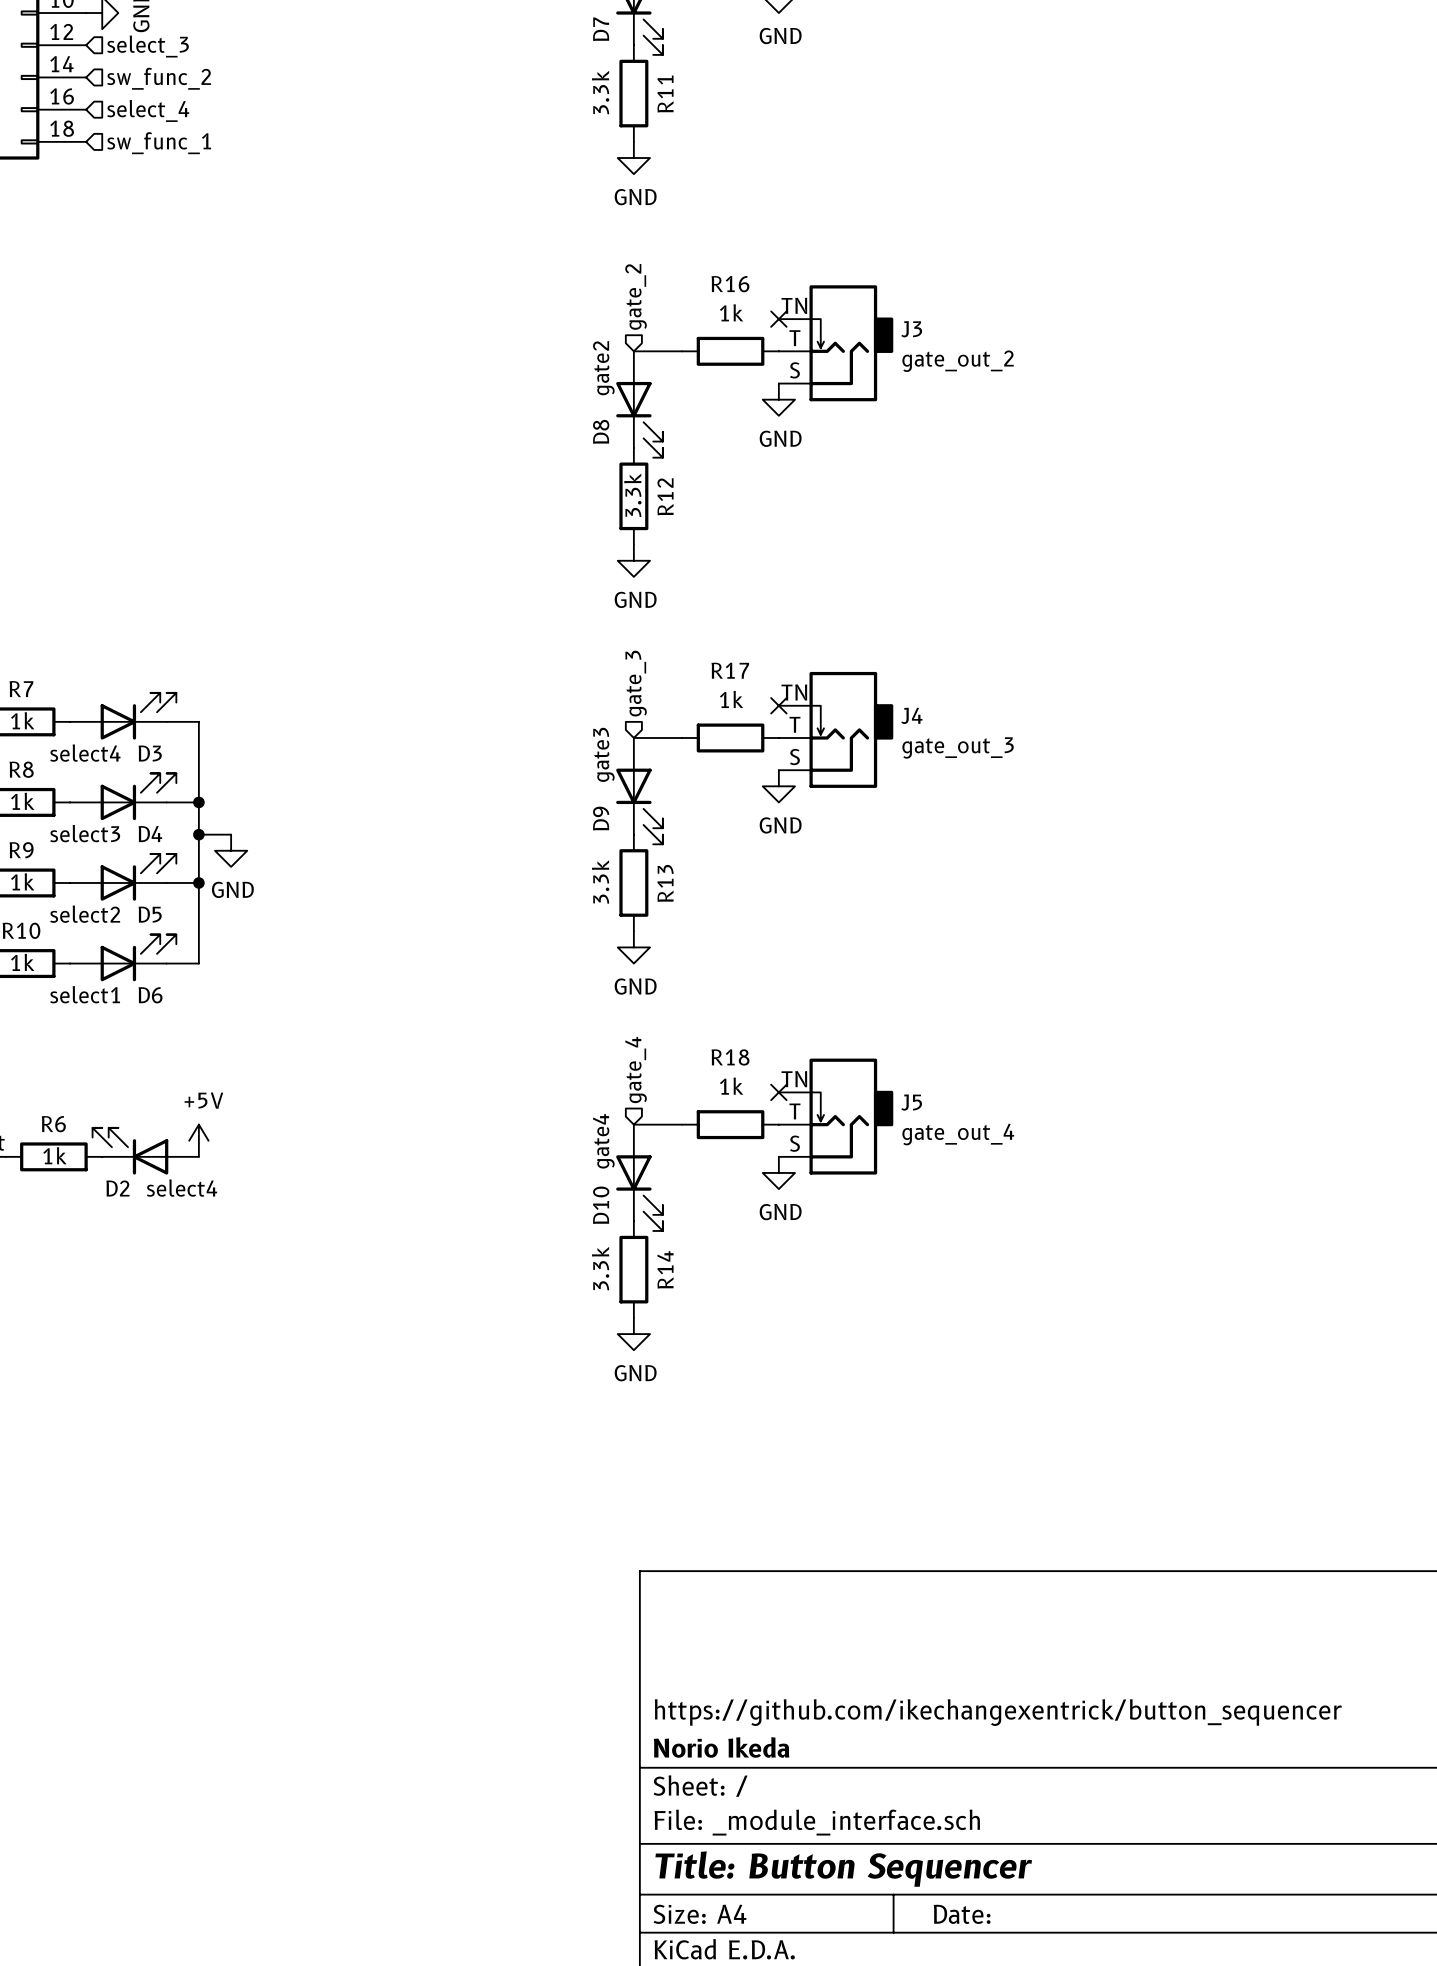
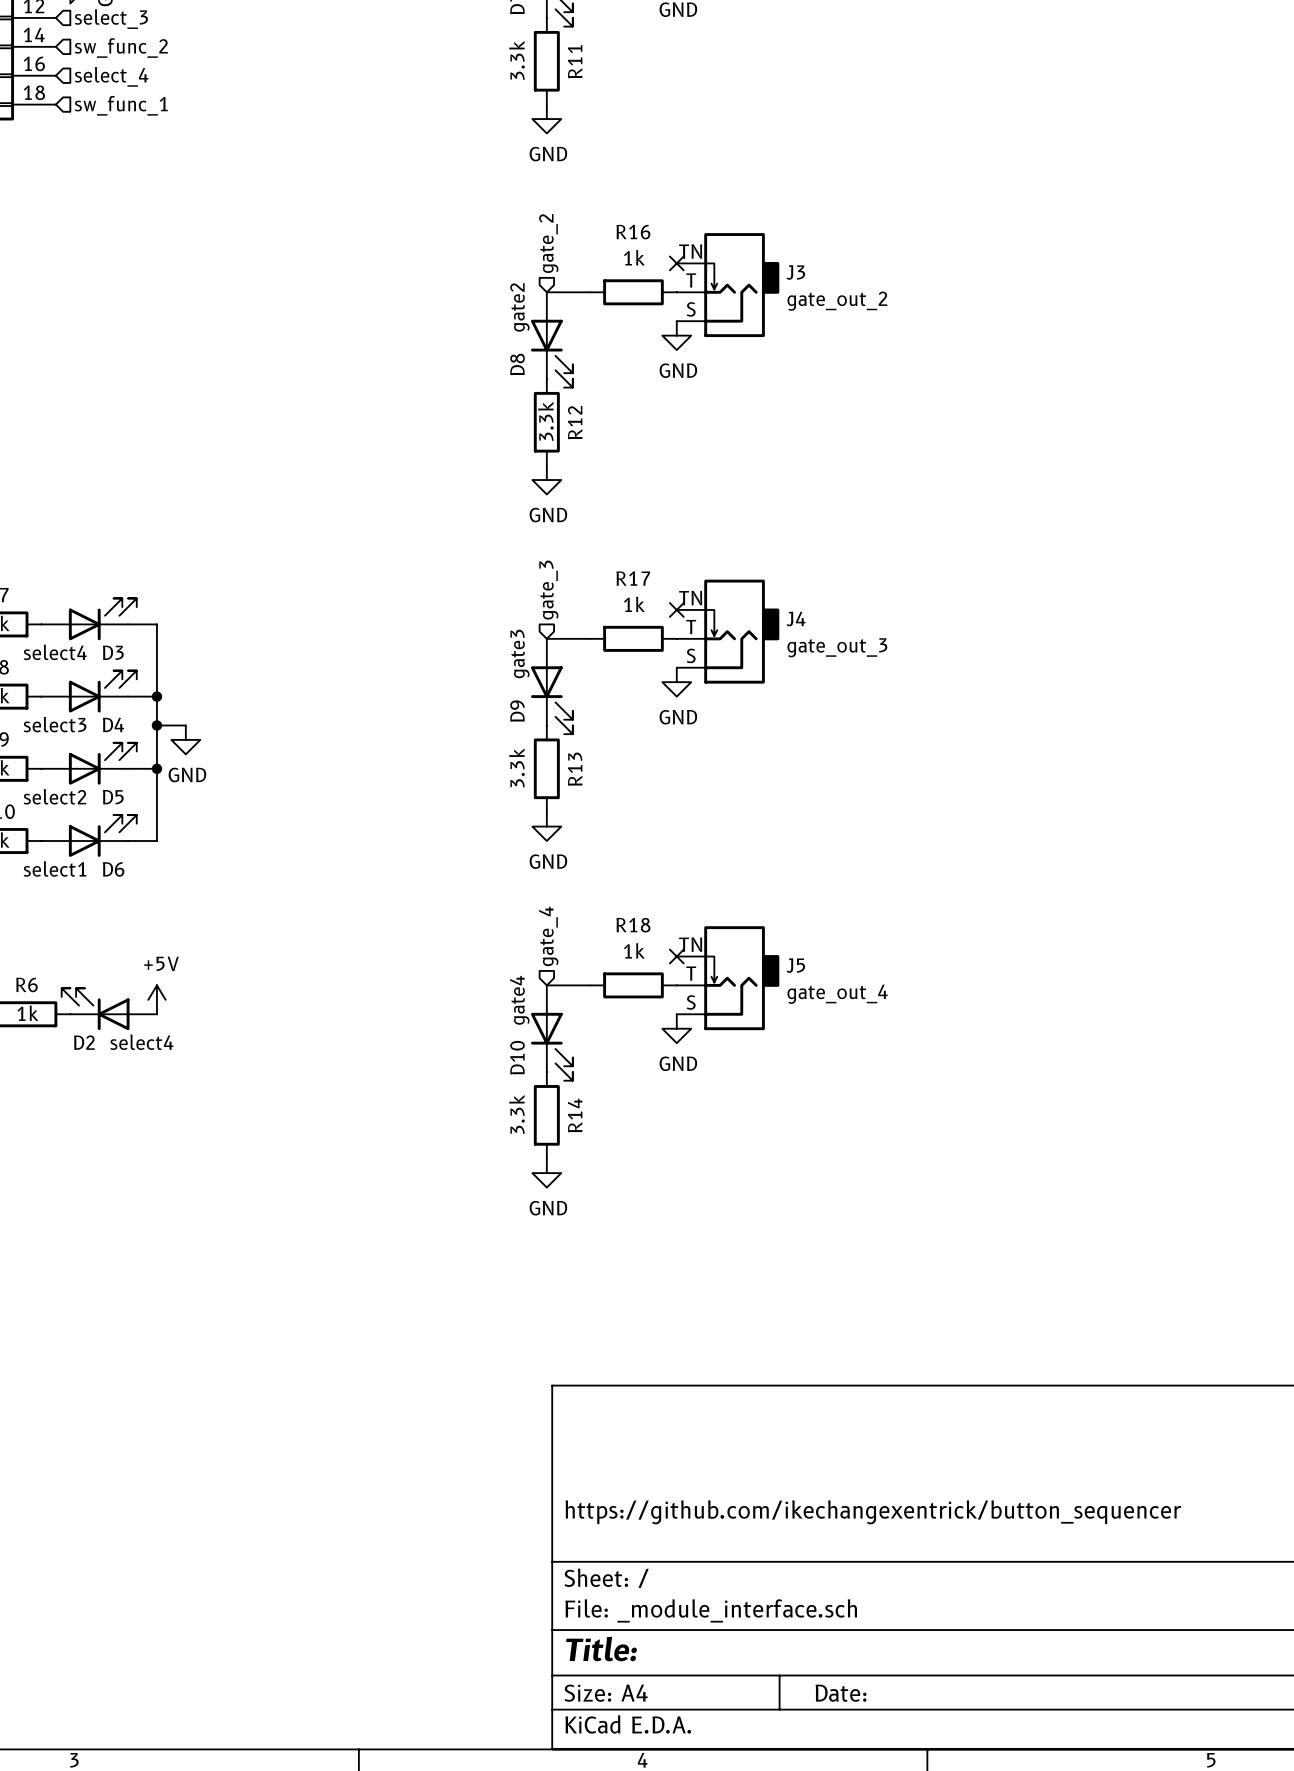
title block: Norio Ikeda (721, 1747) -> none
title block: Title: Button Sequencer (843, 1869) -> Title: (601, 1648)

